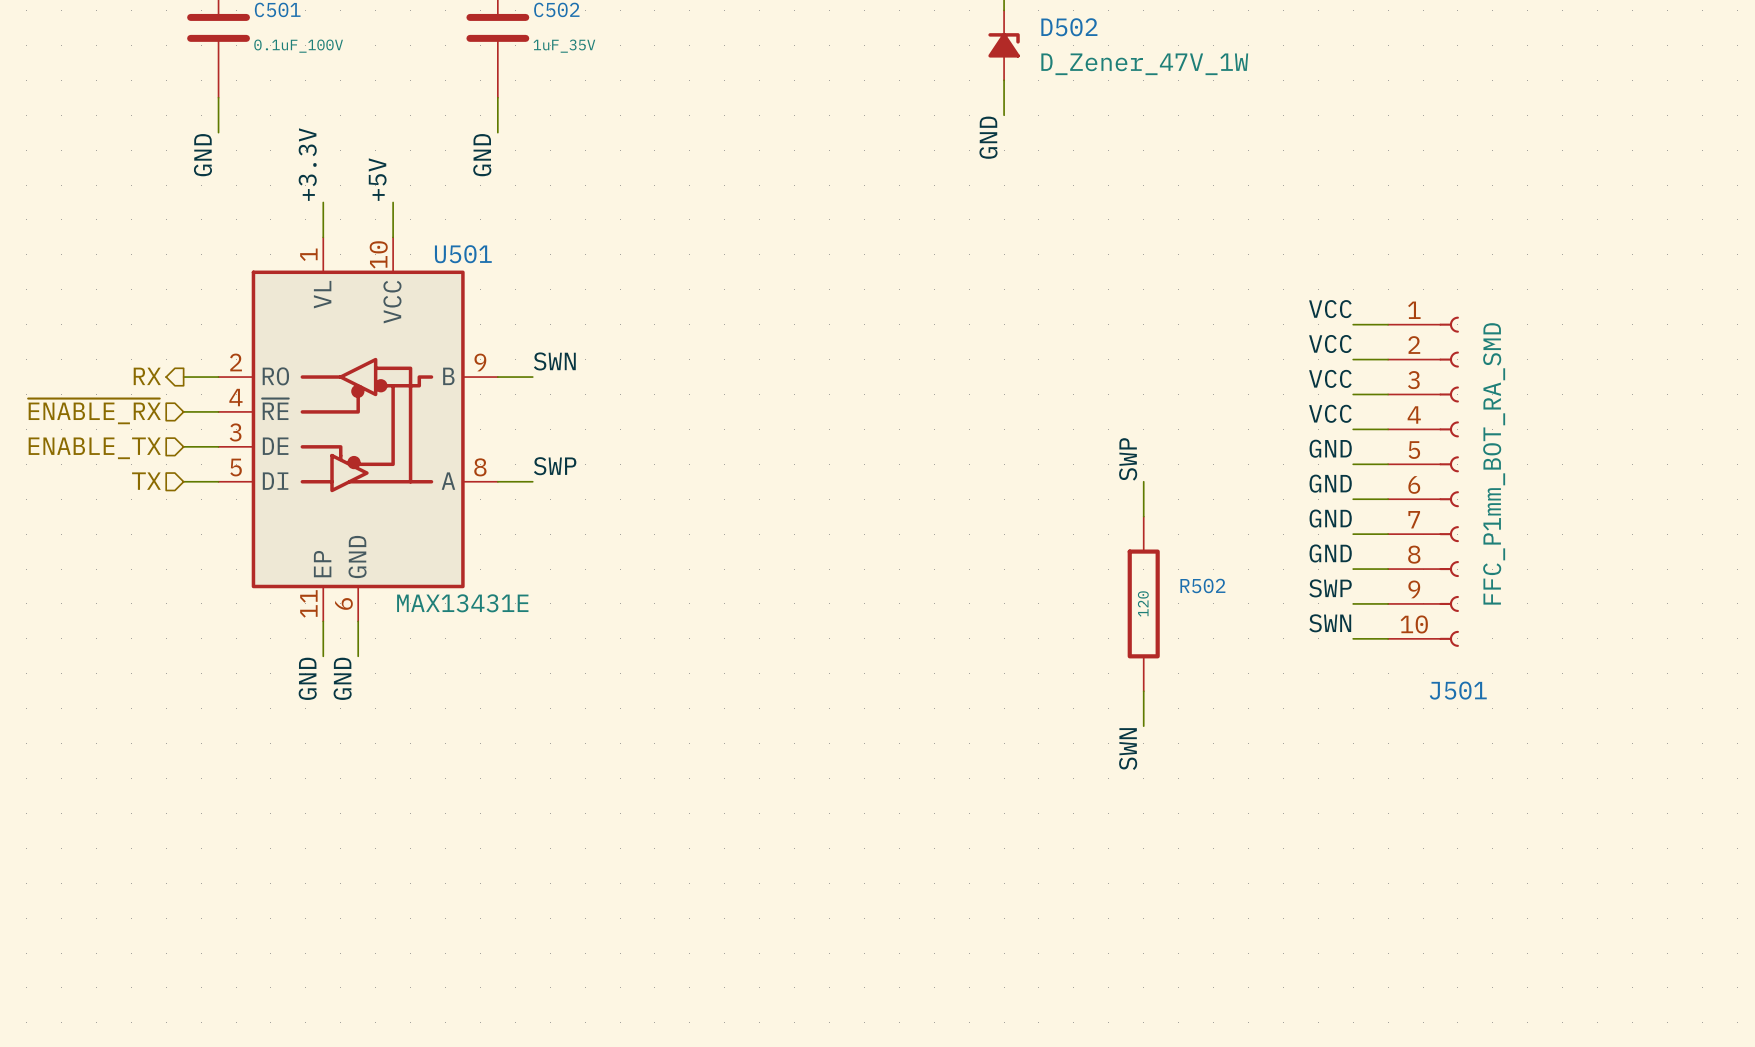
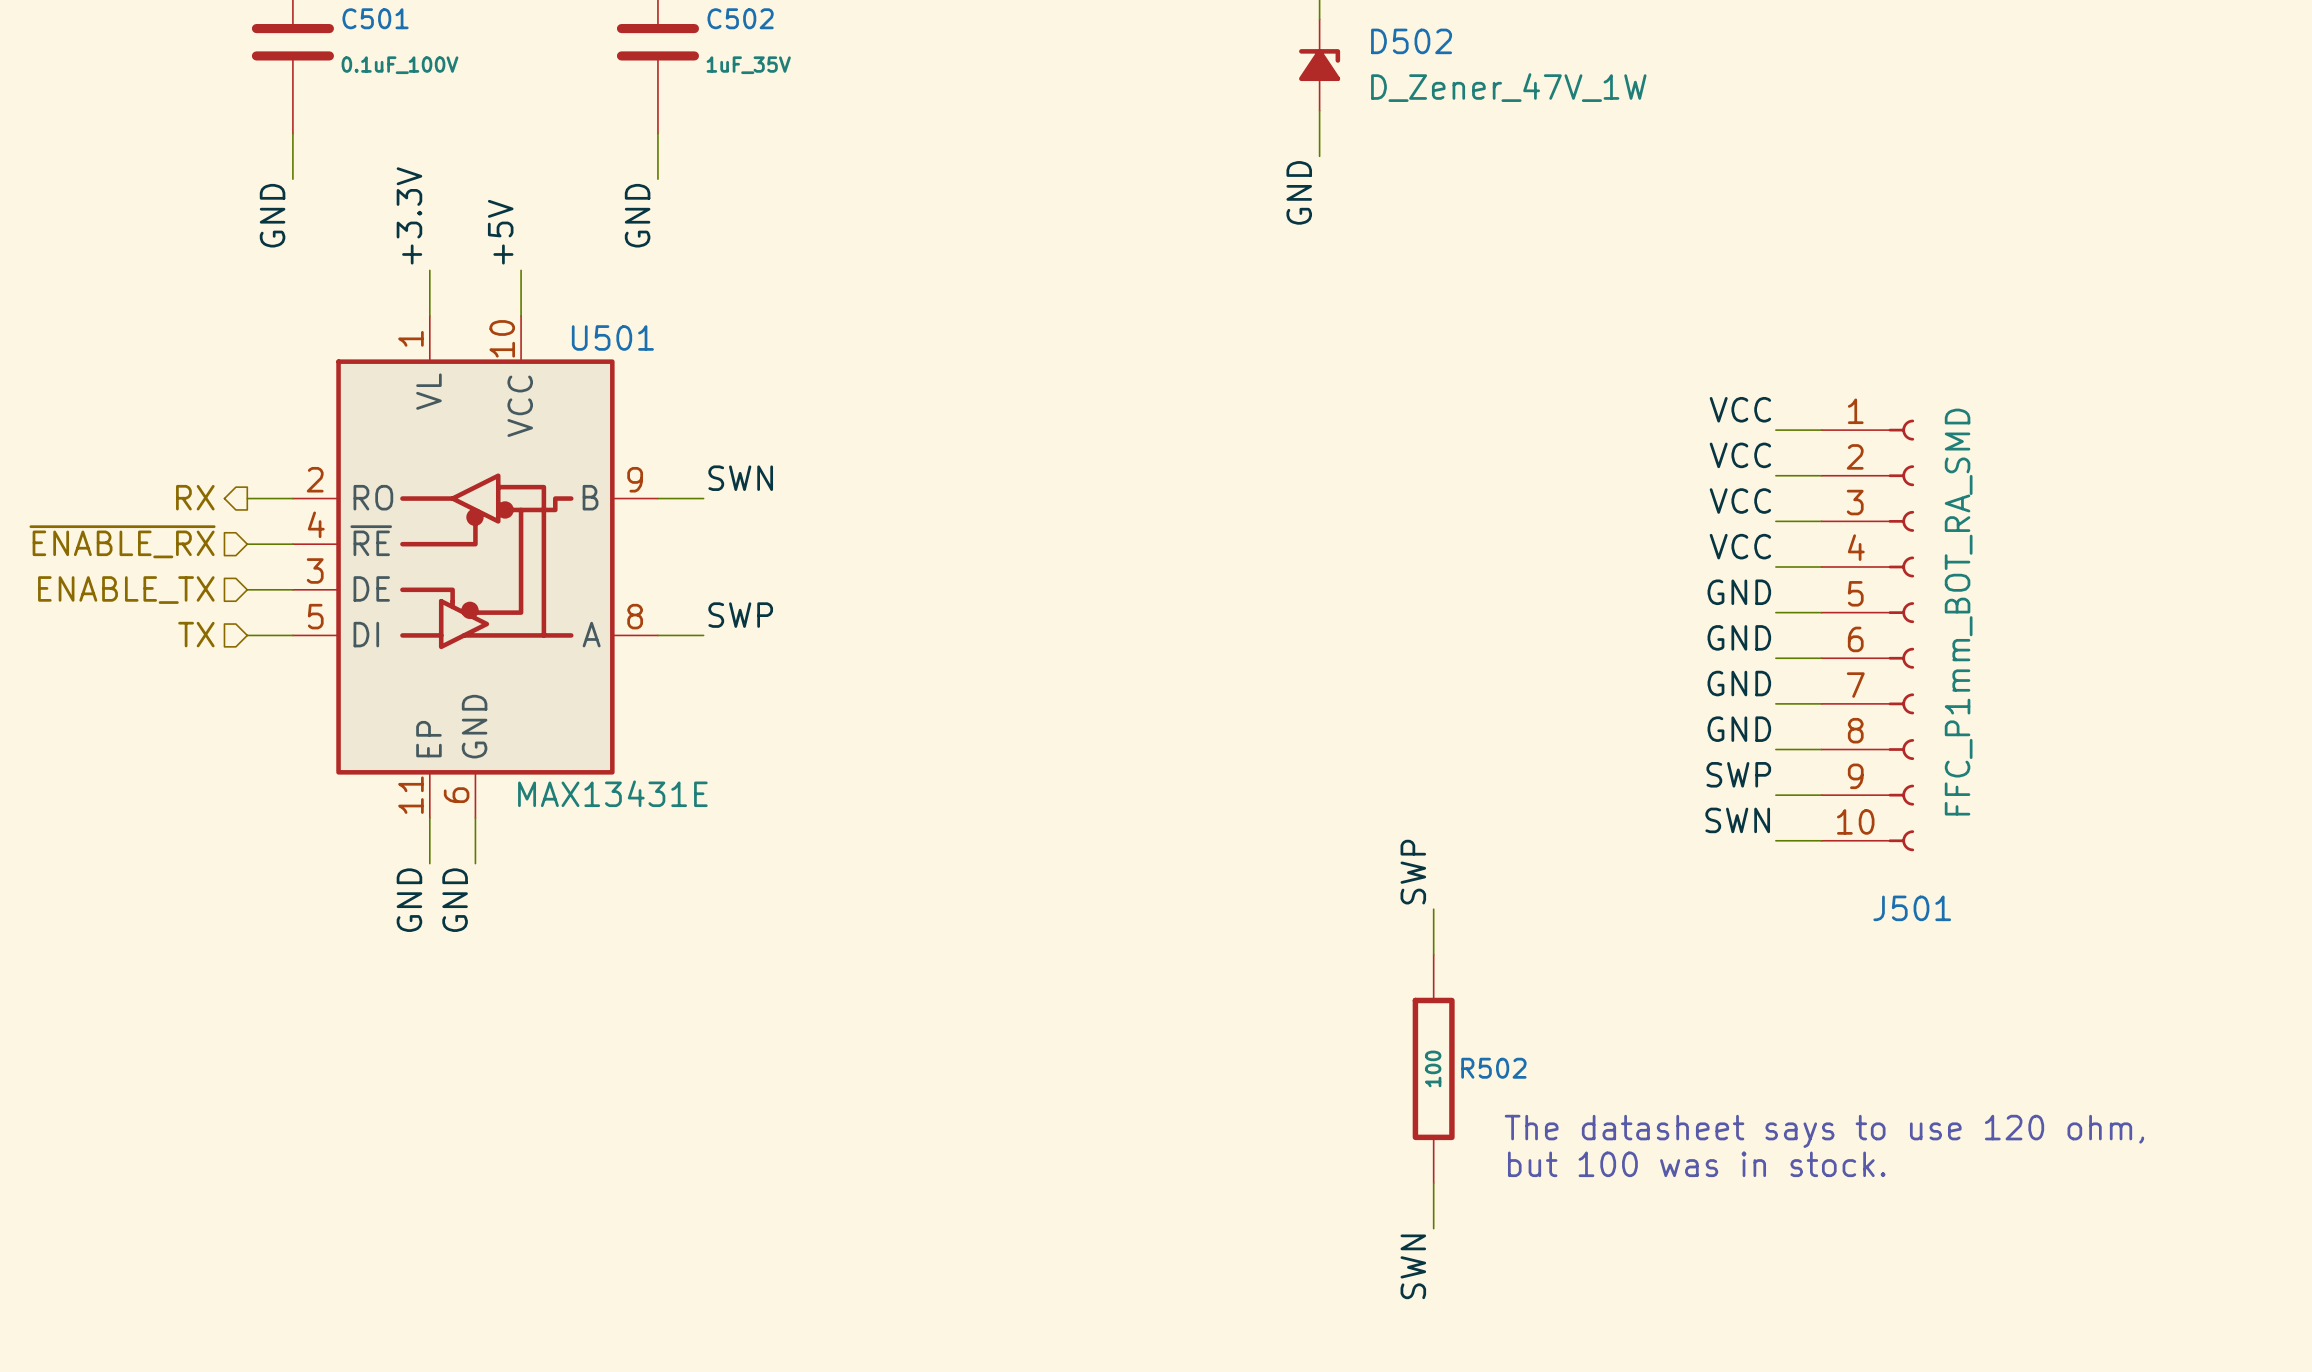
label position: SWP (1128, 459) -> SWP (1413, 872)
wire: (1143, 481) (1143, 516) -> none
R502 name position: R502 (1202, 585) -> R502 (1493, 1068)
R502 position: (1143, 603) -> (1433, 1068)
R502 value: 120 (1143, 603) -> 100 (1433, 1068)
wire: (1143, 691) (1143, 726) -> (1433, 909) (1433, 954)
label position: SWN (1128, 749) -> SWN (1413, 1266)
text: none -> The datasheet says to use 120 ohm, (1824, 1131)
text: none -> but 100 was in stock. (1696, 1164)
wire: none -> (1433, 1183) (1433, 1228)

